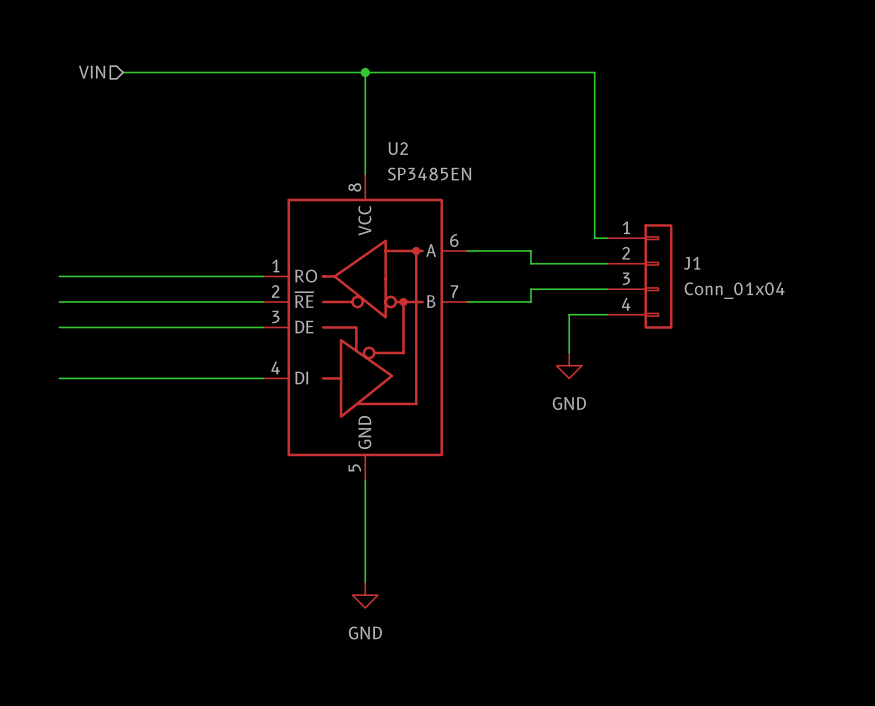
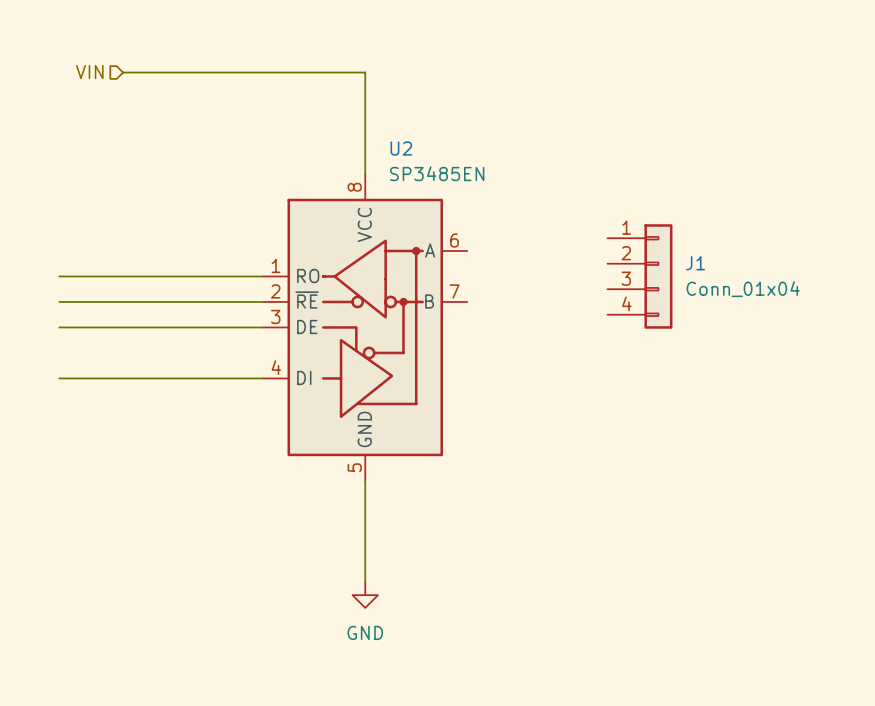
wire: (365, 72) (594, 72) (594, 238) (607, 238) -> none
junction: (365, 72) -> none
wire: (467, 250) (530, 250) (530, 263) (607, 263) -> none
wire: (607, 289) (530, 289) (530, 301) (467, 301) -> none
wire: (607, 314) (569, 314) (569, 352) -> none
power symbol: GND (569, 365) -> none

